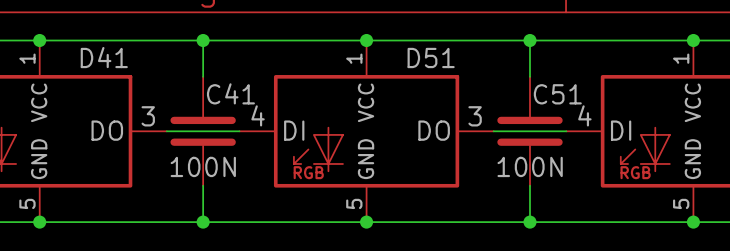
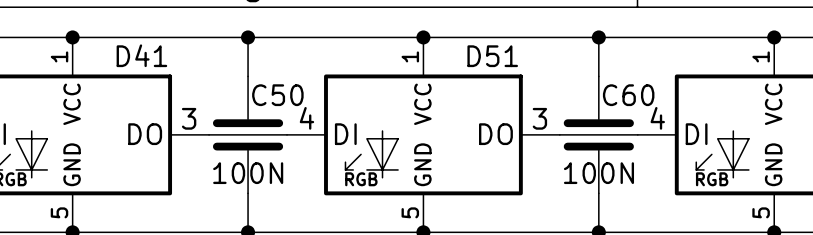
C41 name: C41 (230, 93) -> C50 (277, 95)
C51 name: C51 (557, 94) -> C60 (628, 95)

